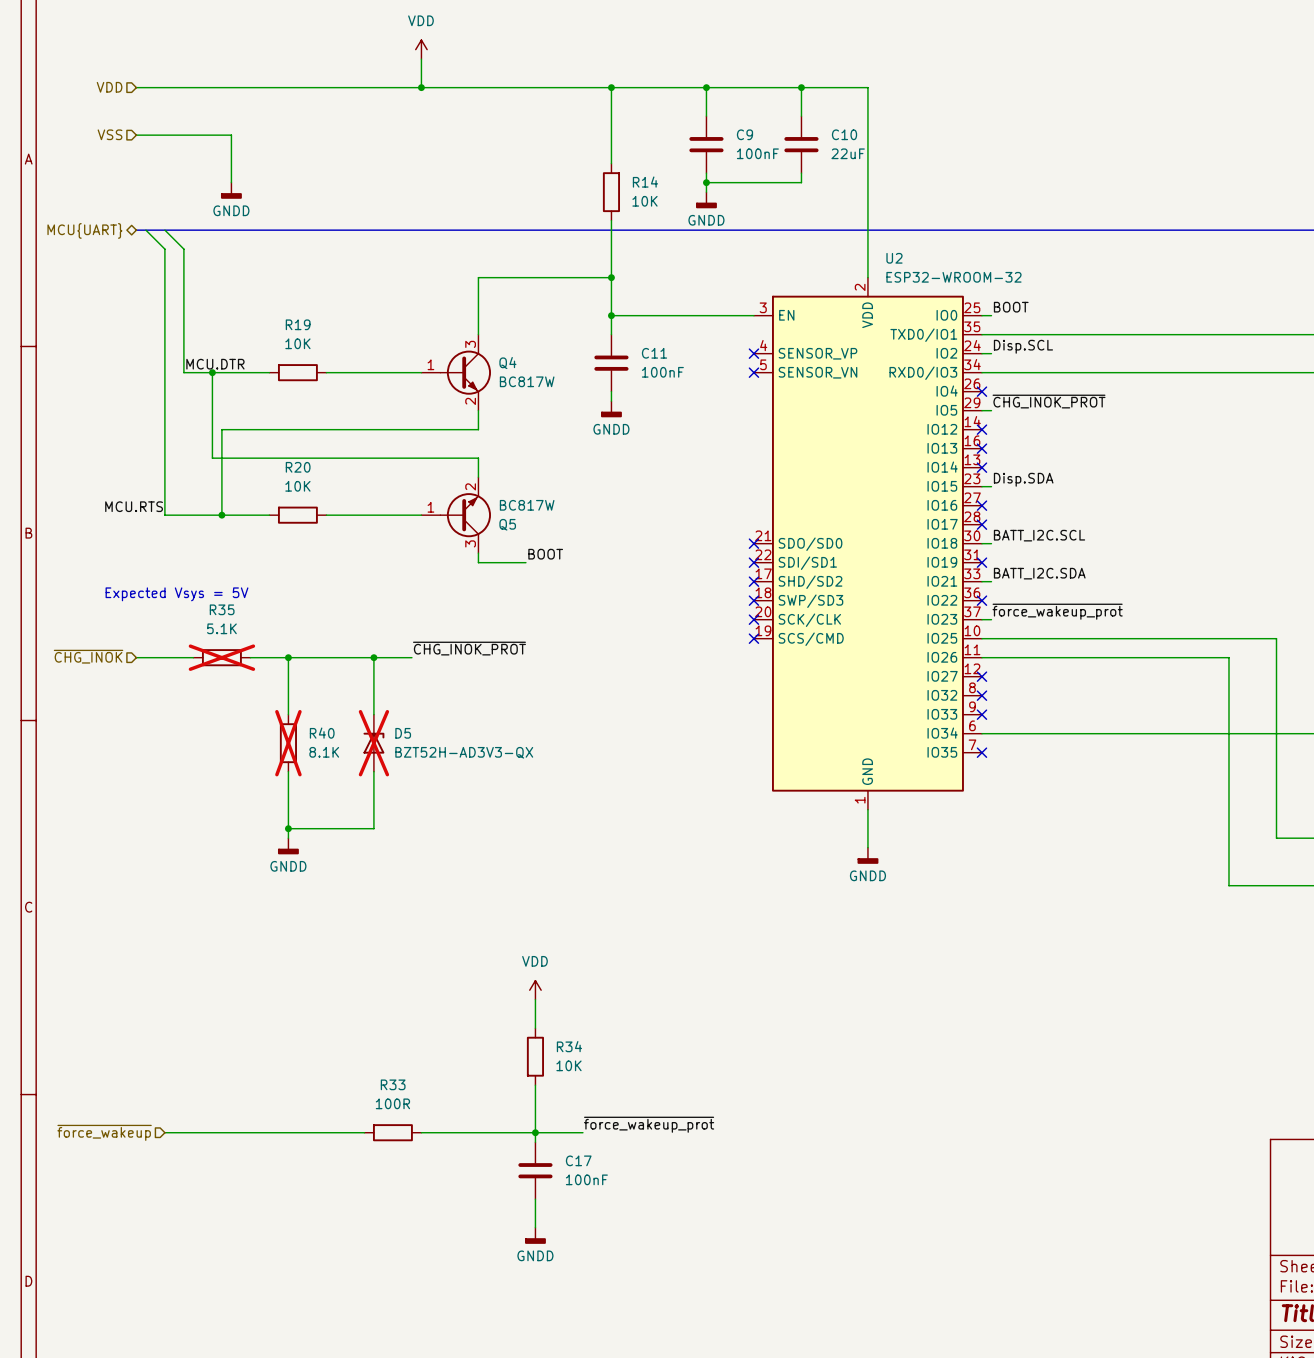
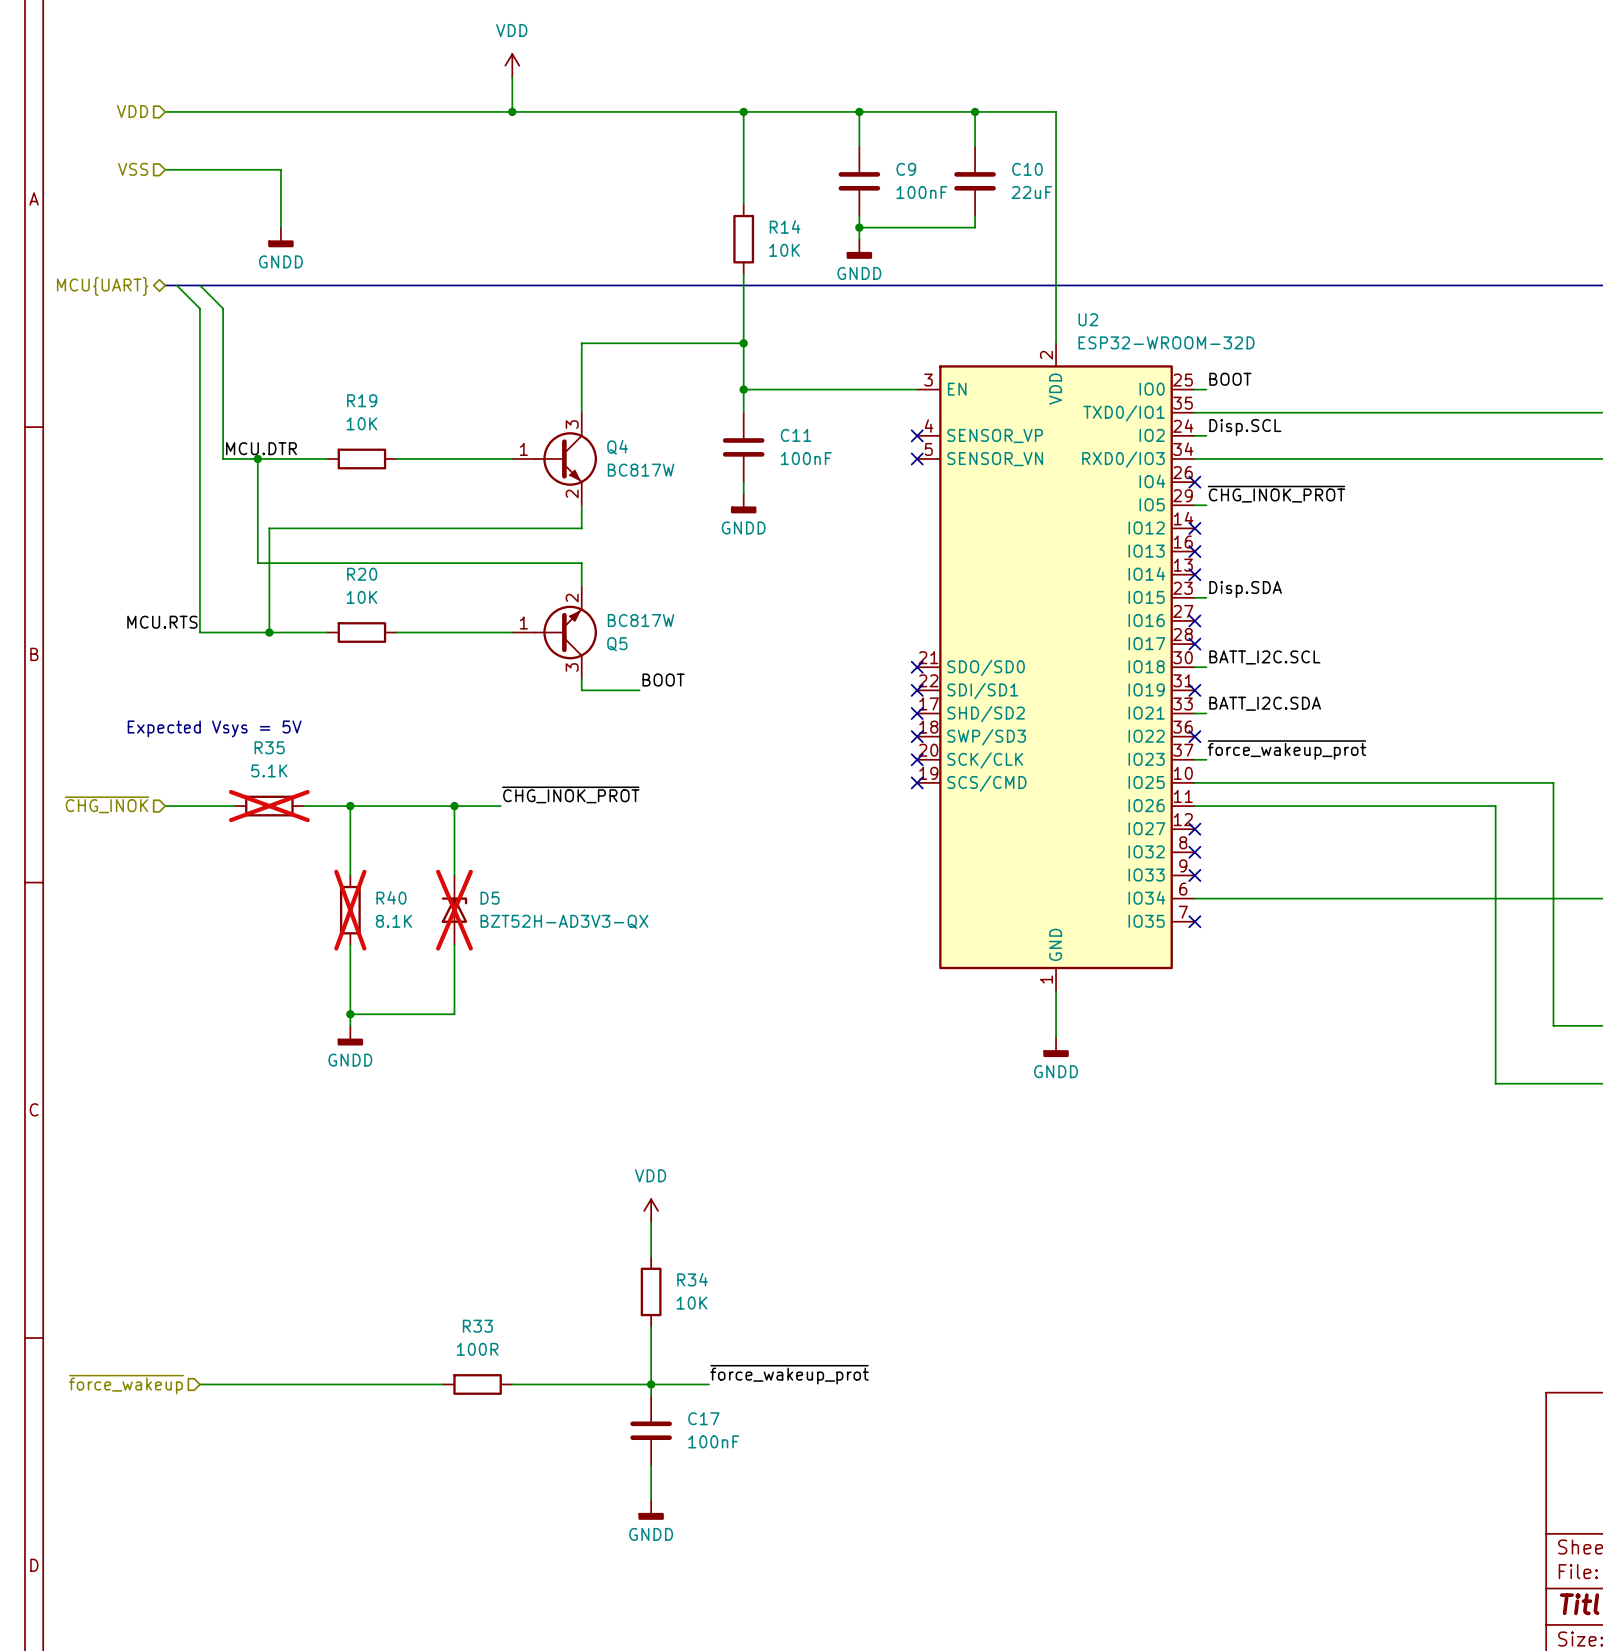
U2 value: ESP32-WROOM-32 (953, 277) -> ESP32-WROOM-32D (1166, 342)

